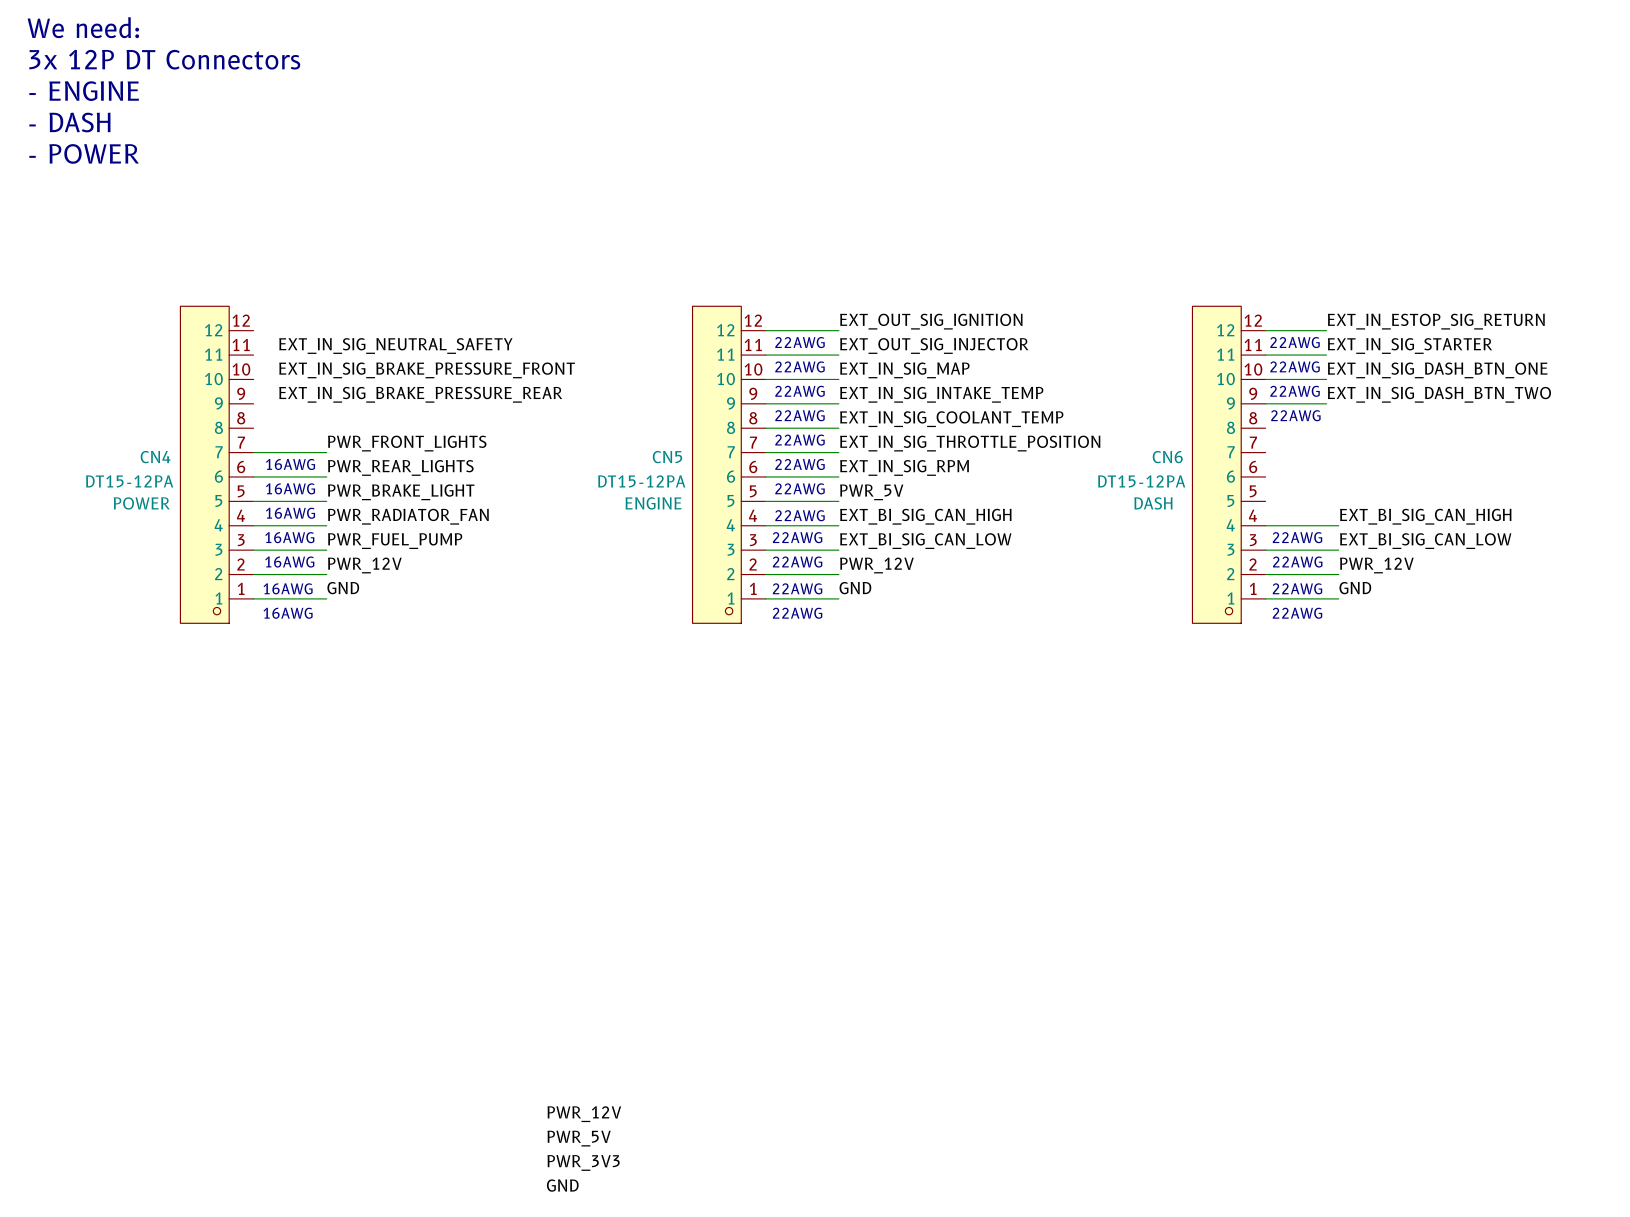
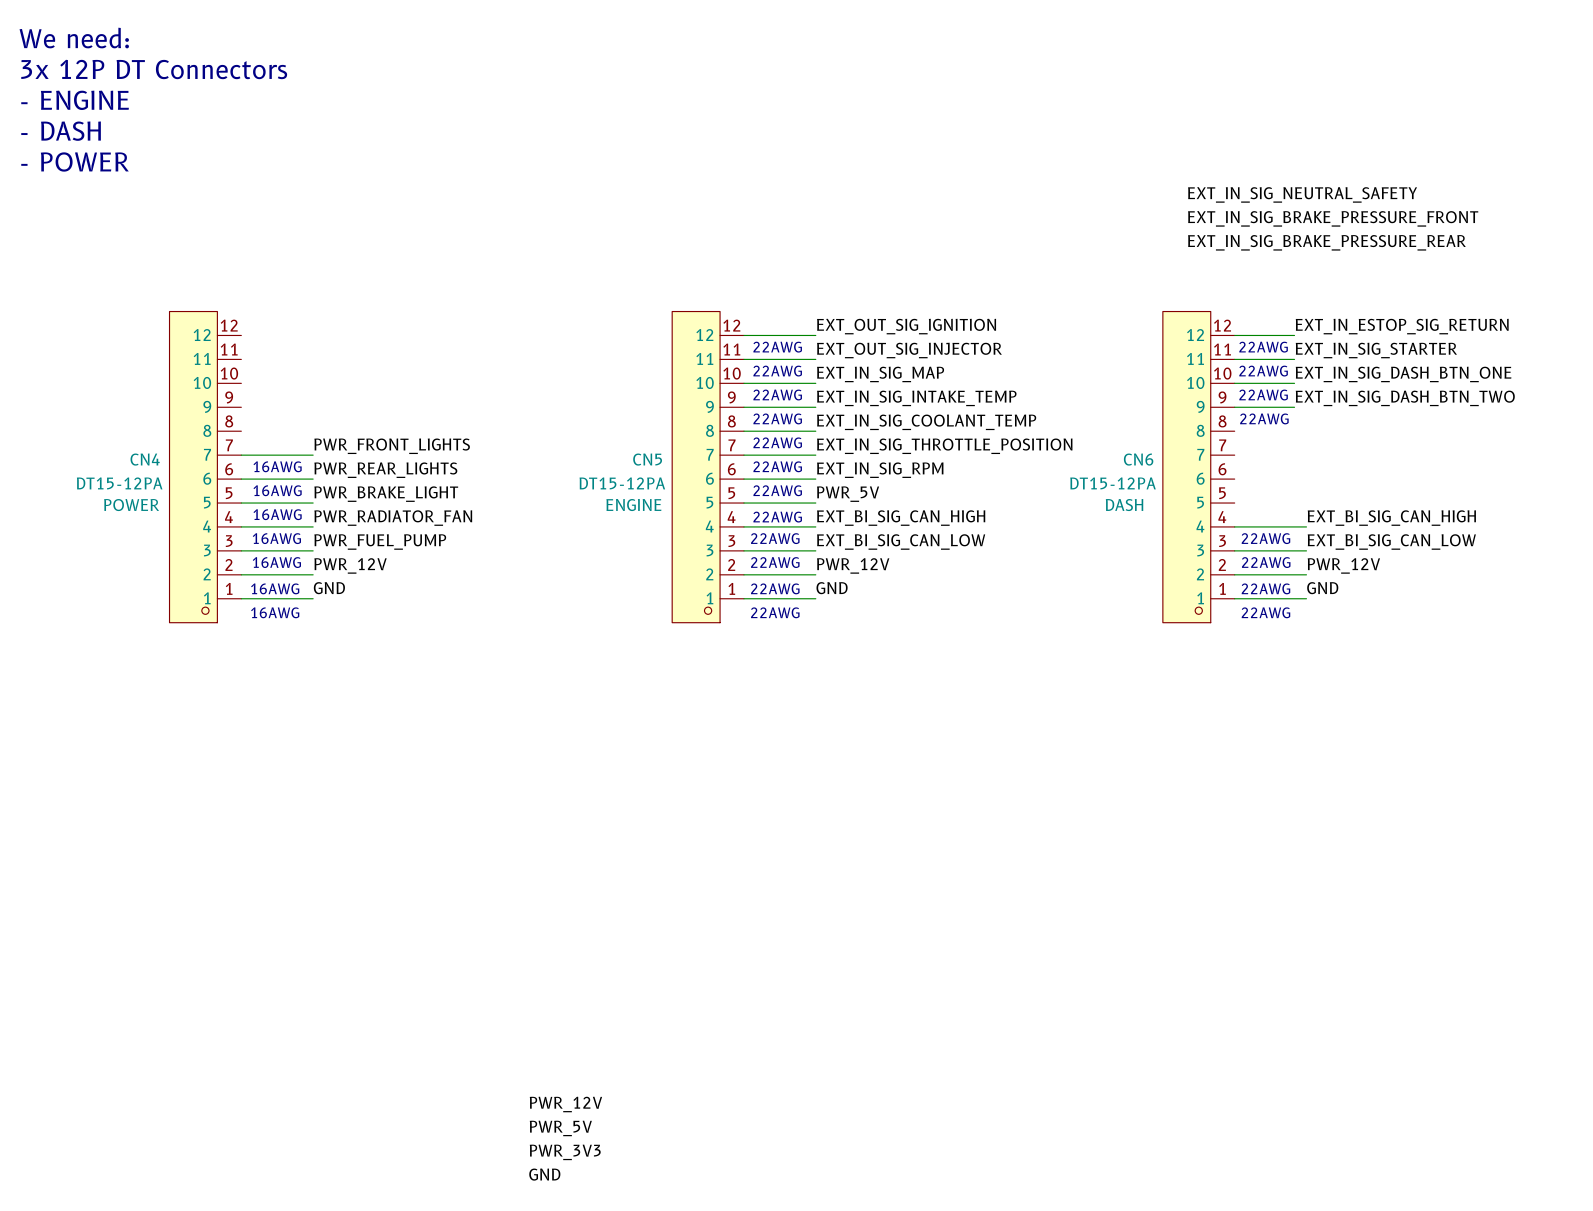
label: none -> EXT_IN_SIG_NEUTRAL_SAFETY (1302, 194)
label: none -> EXT_IN_SIG_BRAKE_PRESSURE_FRONT (1333, 218)
label: none -> EXT_IN_SIG_BRAKE_PRESSURE_REAR (1326, 242)
label: EXT_IN_SIG_NEUTRAL_SAFETY (395, 346) -> none
label: EXT_IN_SIG_BRAKE_PRESSURE_FRONT (427, 370) -> none
label: EXT_IN_SIG_BRAKE_PRESSURE_REAR (420, 394) -> none

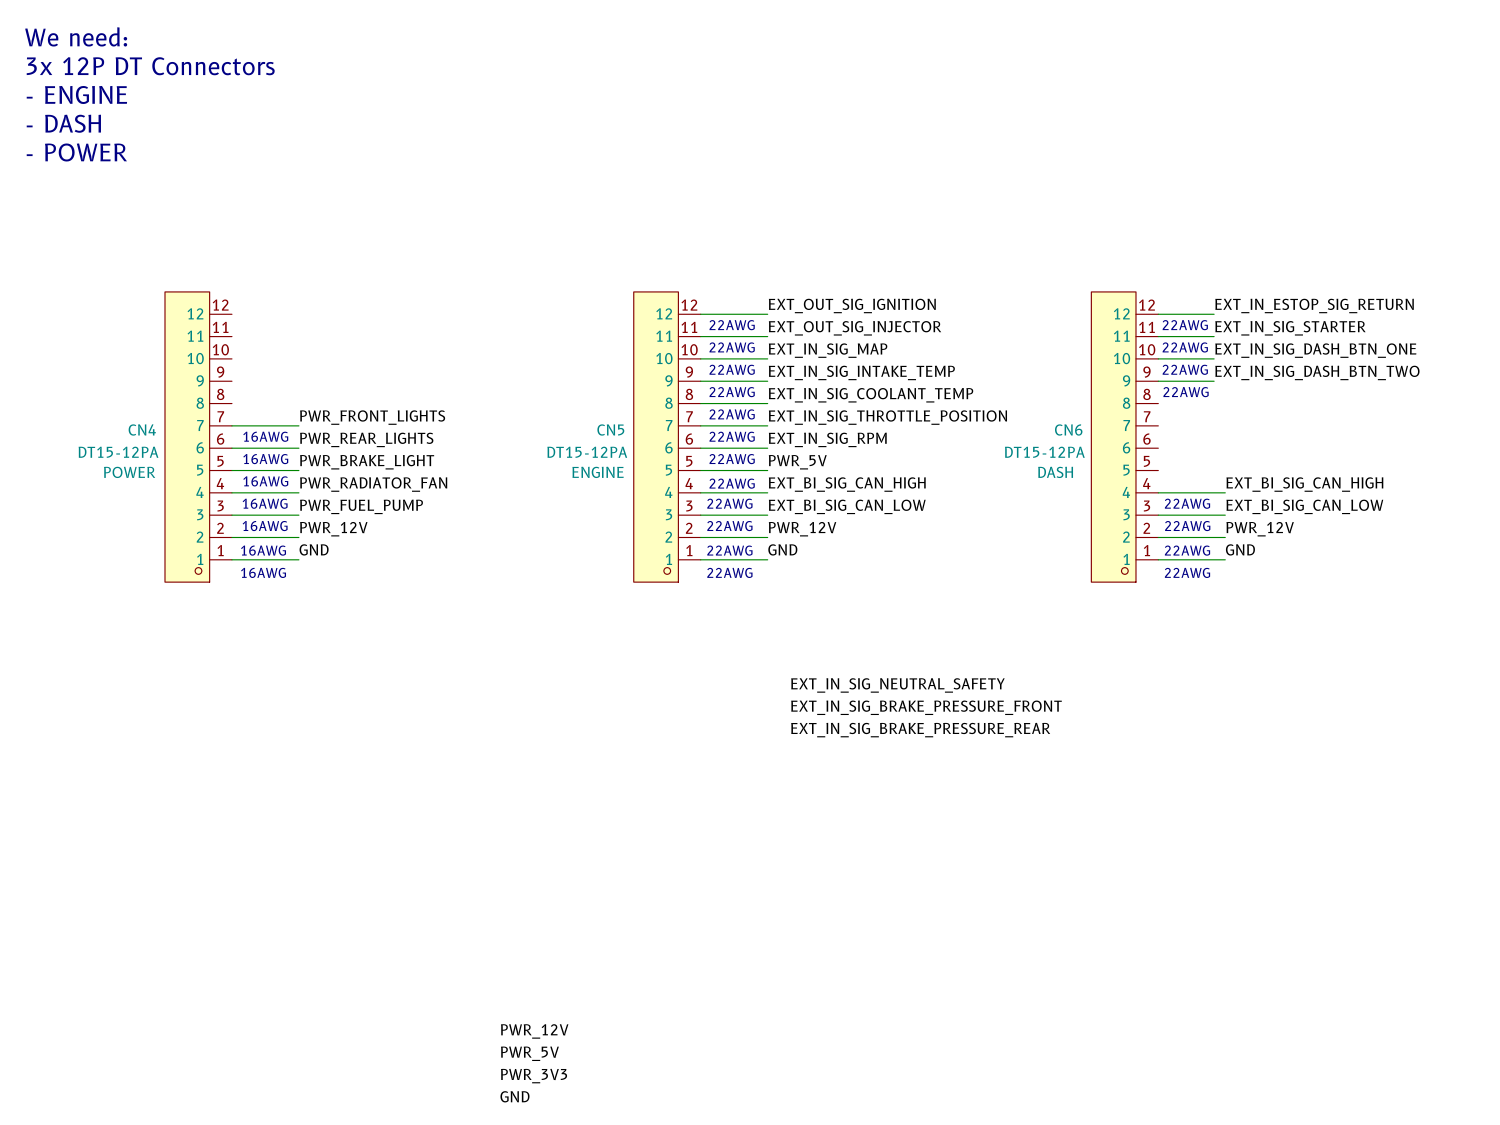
label: EXT_IN_SIG_NEUTRAL_SAFETY (1302, 194) -> none
label: EXT_IN_SIG_BRAKE_PRESSURE_FRONT (1333, 218) -> none
label: EXT_IN_SIG_BRAKE_PRESSURE_REAR (1326, 242) -> none
label: none -> EXT_IN_SIG_NEUTRAL_SAFETY (897, 685)
label: none -> EXT_IN_SIG_BRAKE_PRESSURE_FRONT (926, 707)
label: none -> EXT_IN_SIG_BRAKE_PRESSURE_REAR (920, 730)

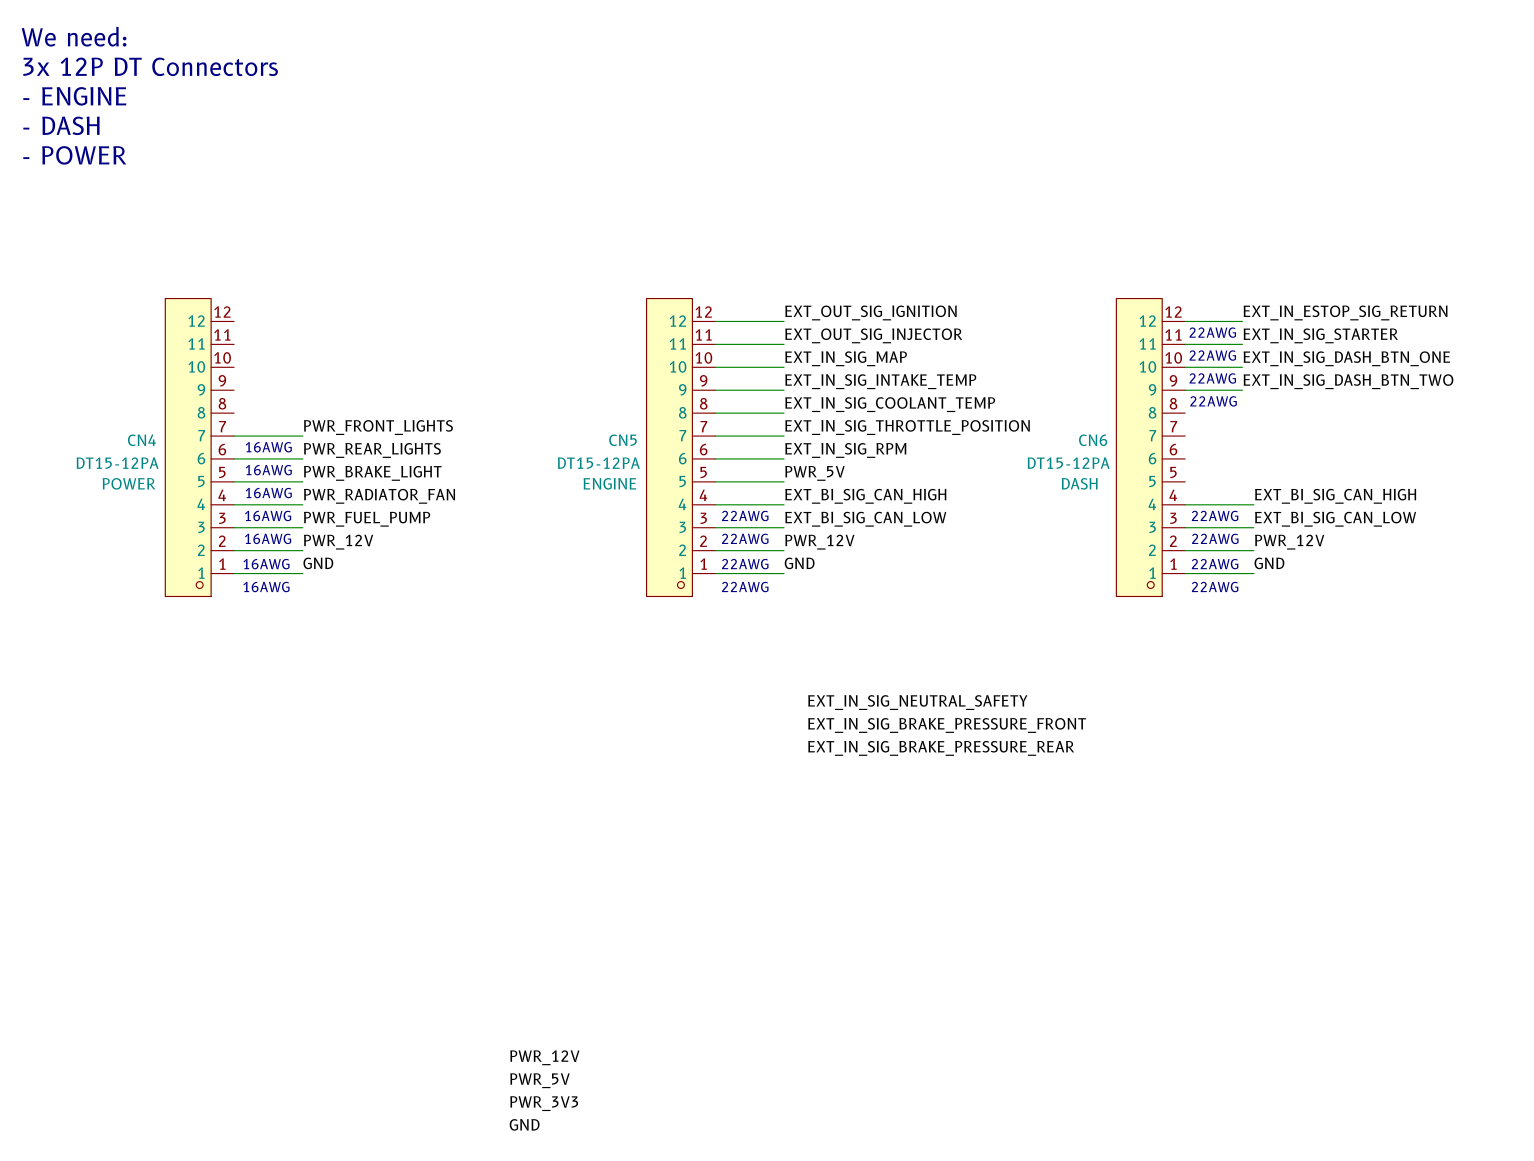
text: 22AWG (732, 325) -> none
text: 22AWG (732, 347) -> none
text: 22AWG (732, 369) -> none
text: 22AWG (732, 392) -> none
text: 22AWG (732, 414) -> none
text: 22AWG (732, 436) -> none
text: 22AWG (732, 459) -> none
text: 22AWG (732, 483) -> none

